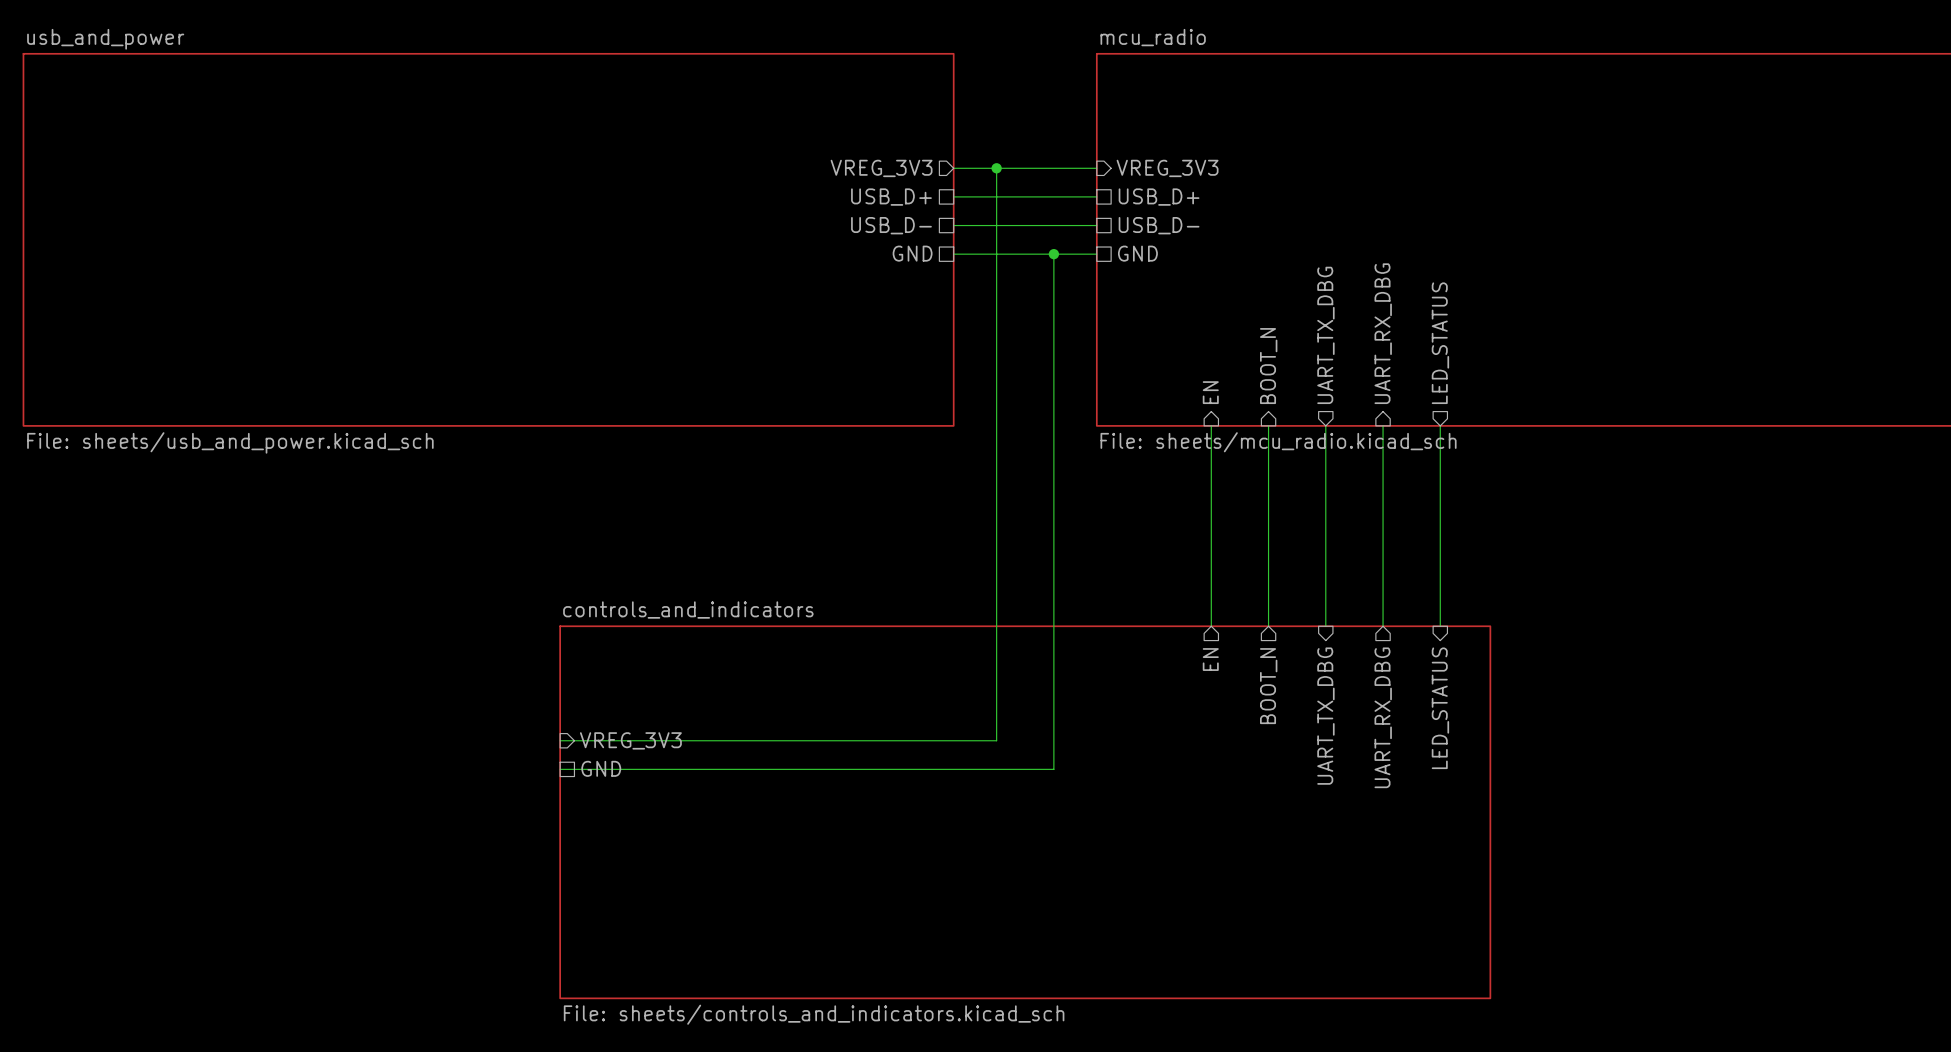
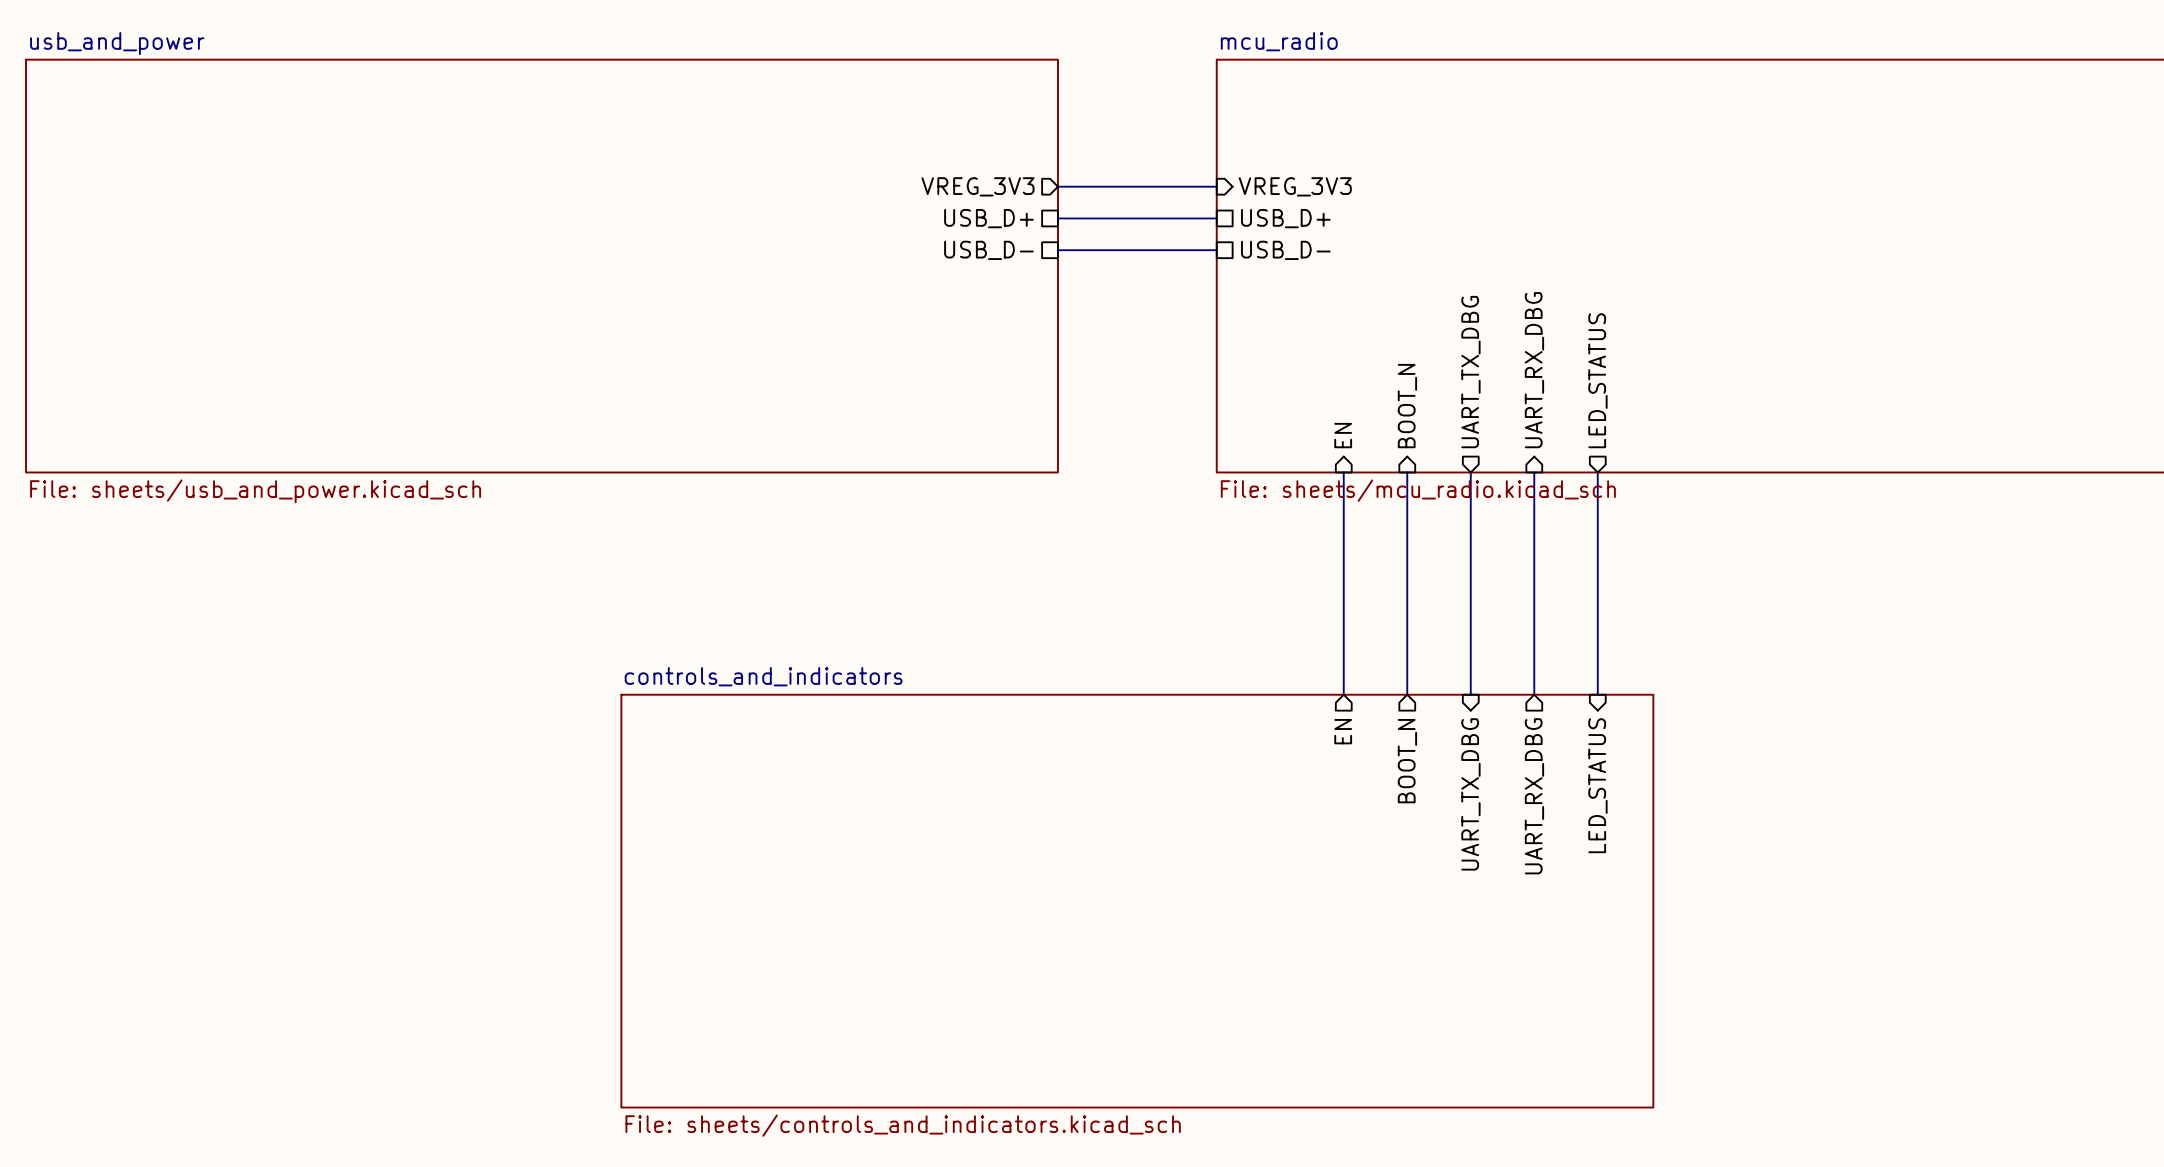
wire: (996, 168) (996, 740) (560, 740) -> none
junction: (996, 168) -> none
sheet pin: GND (912, 253) -> none
sheet pin: GND (1137, 253) -> none
wire: (953, 254) (1096, 254) -> none
wire: (1053, 254) (1053, 769) (560, 769) -> none
junction: (1053, 254) -> none
sheet pin: VREG_3V3 (630, 740) -> none
sheet pin: GND (601, 768) -> none

